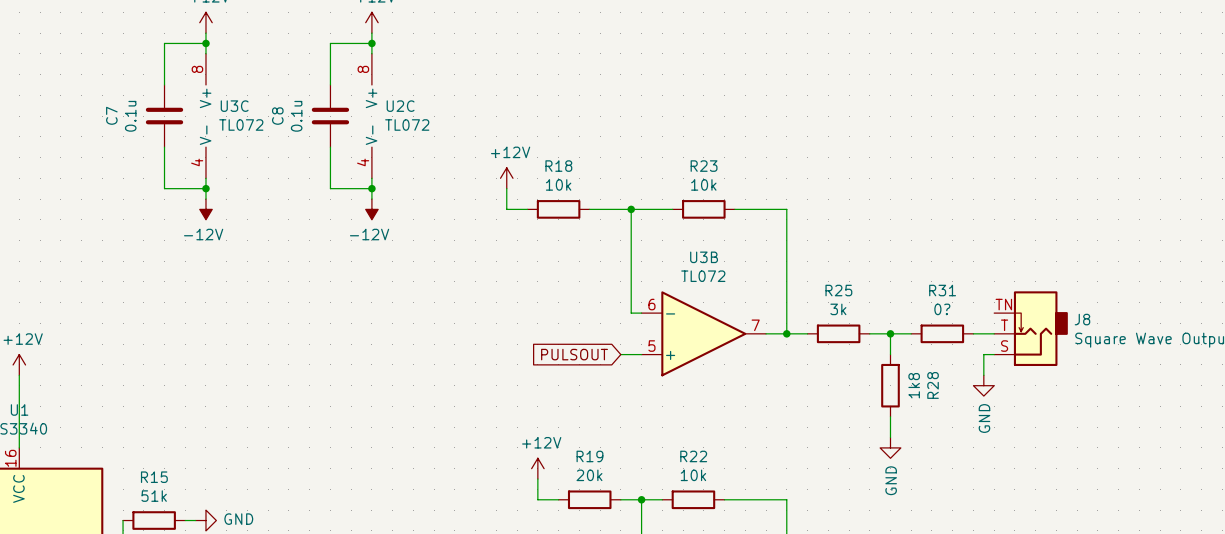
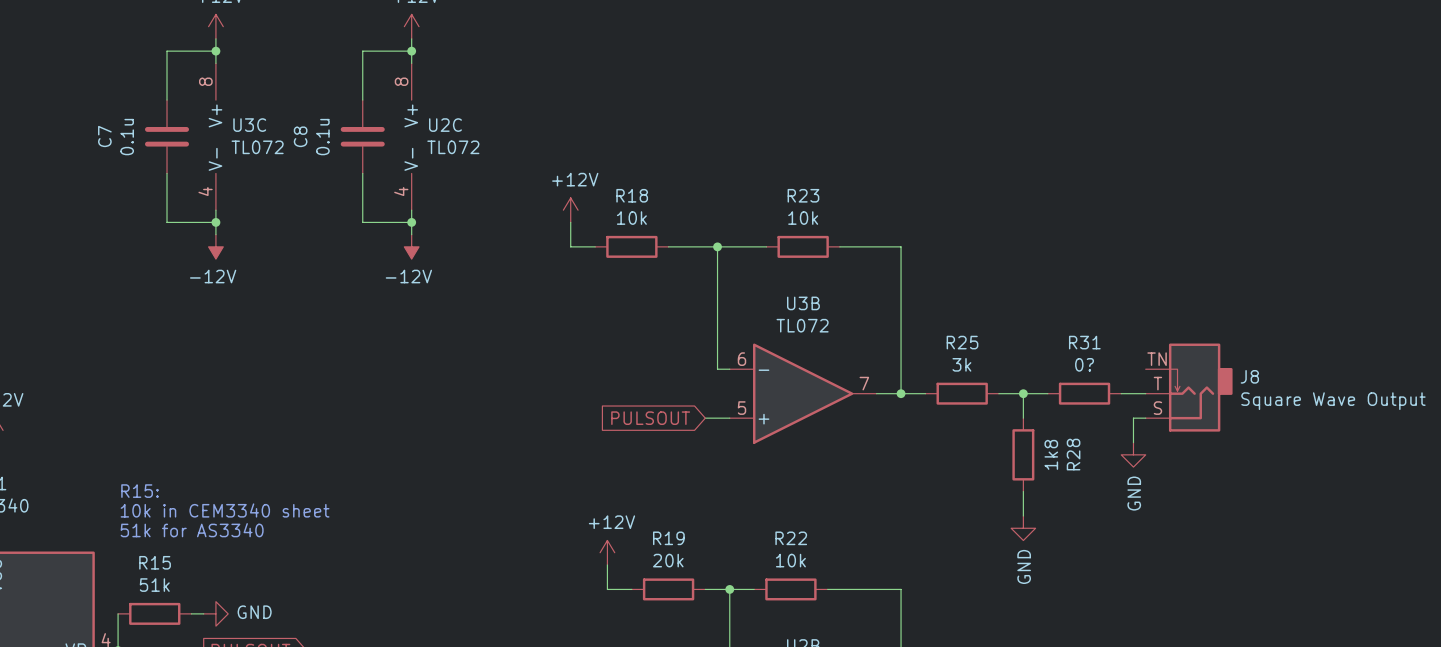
text: none -> R15: (140, 491)
text: none -> 10k in CEM3340 sheet (225, 510)
text: none -> 51k for AS3340 (192, 530)

